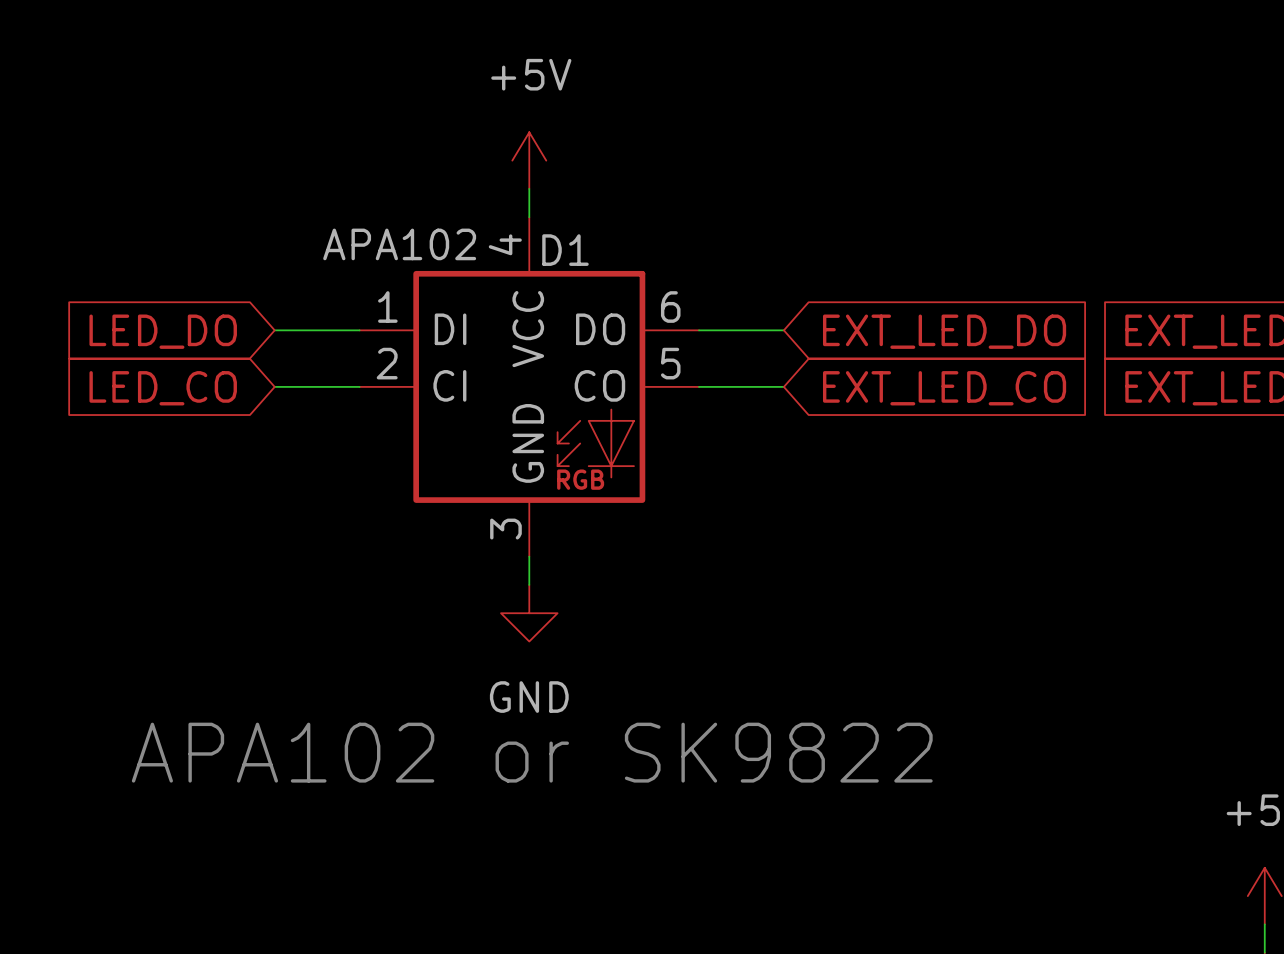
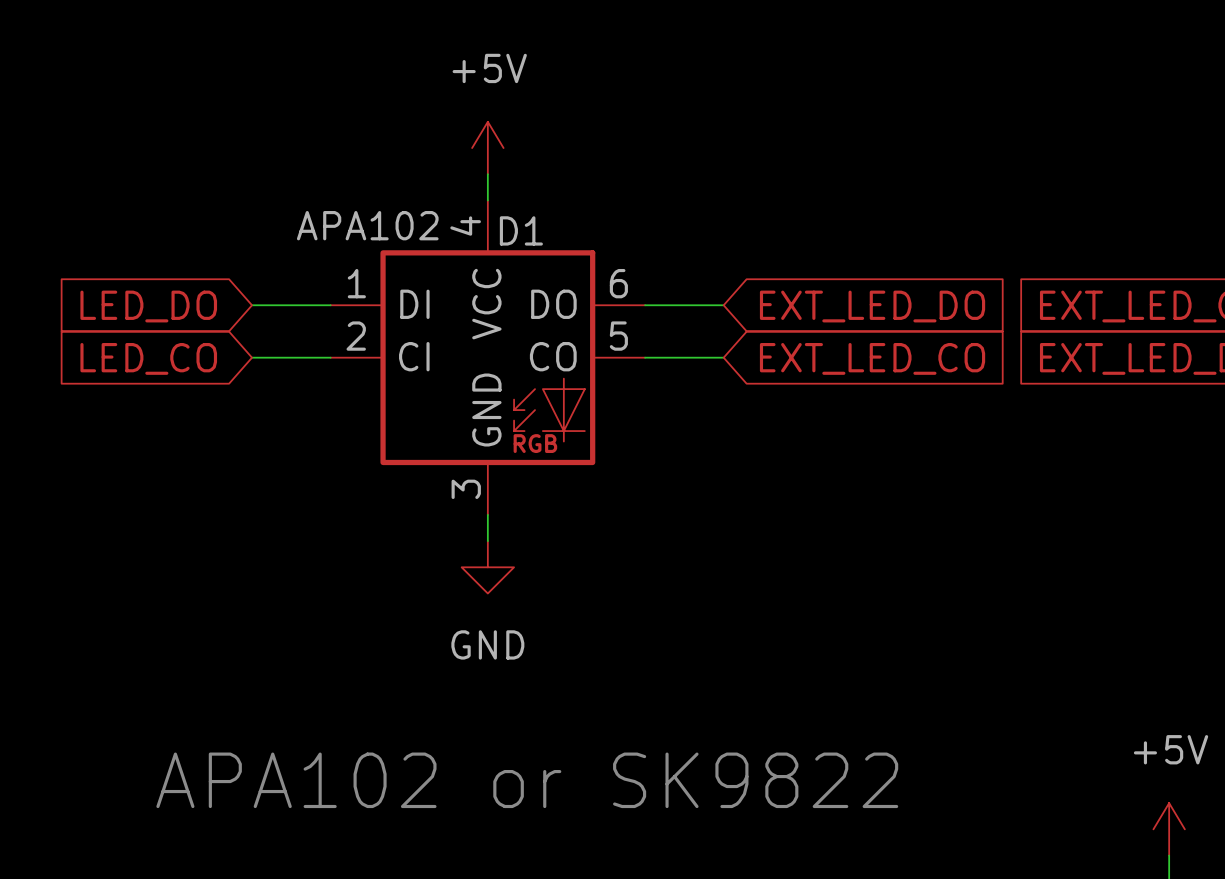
text position: APA102 or SK9822 (532, 752) -> APA102 or SK9822 (527, 780)

